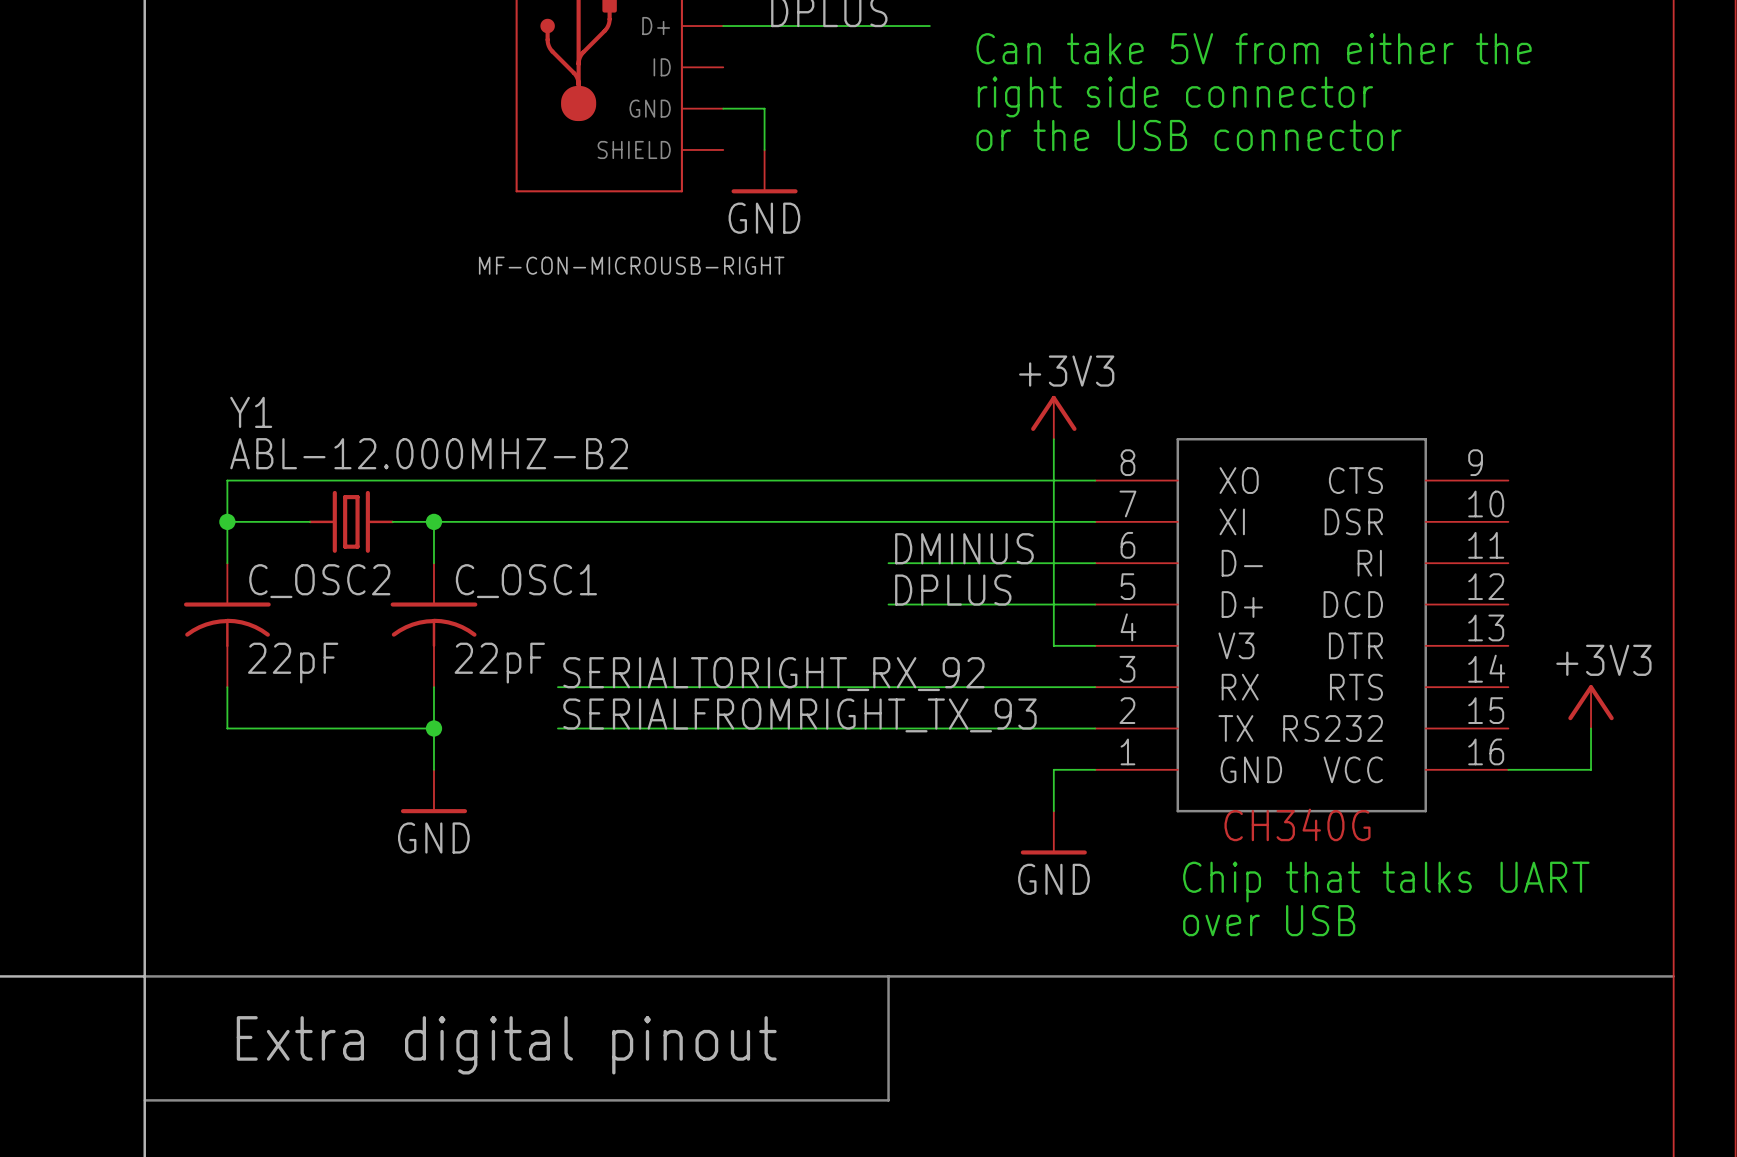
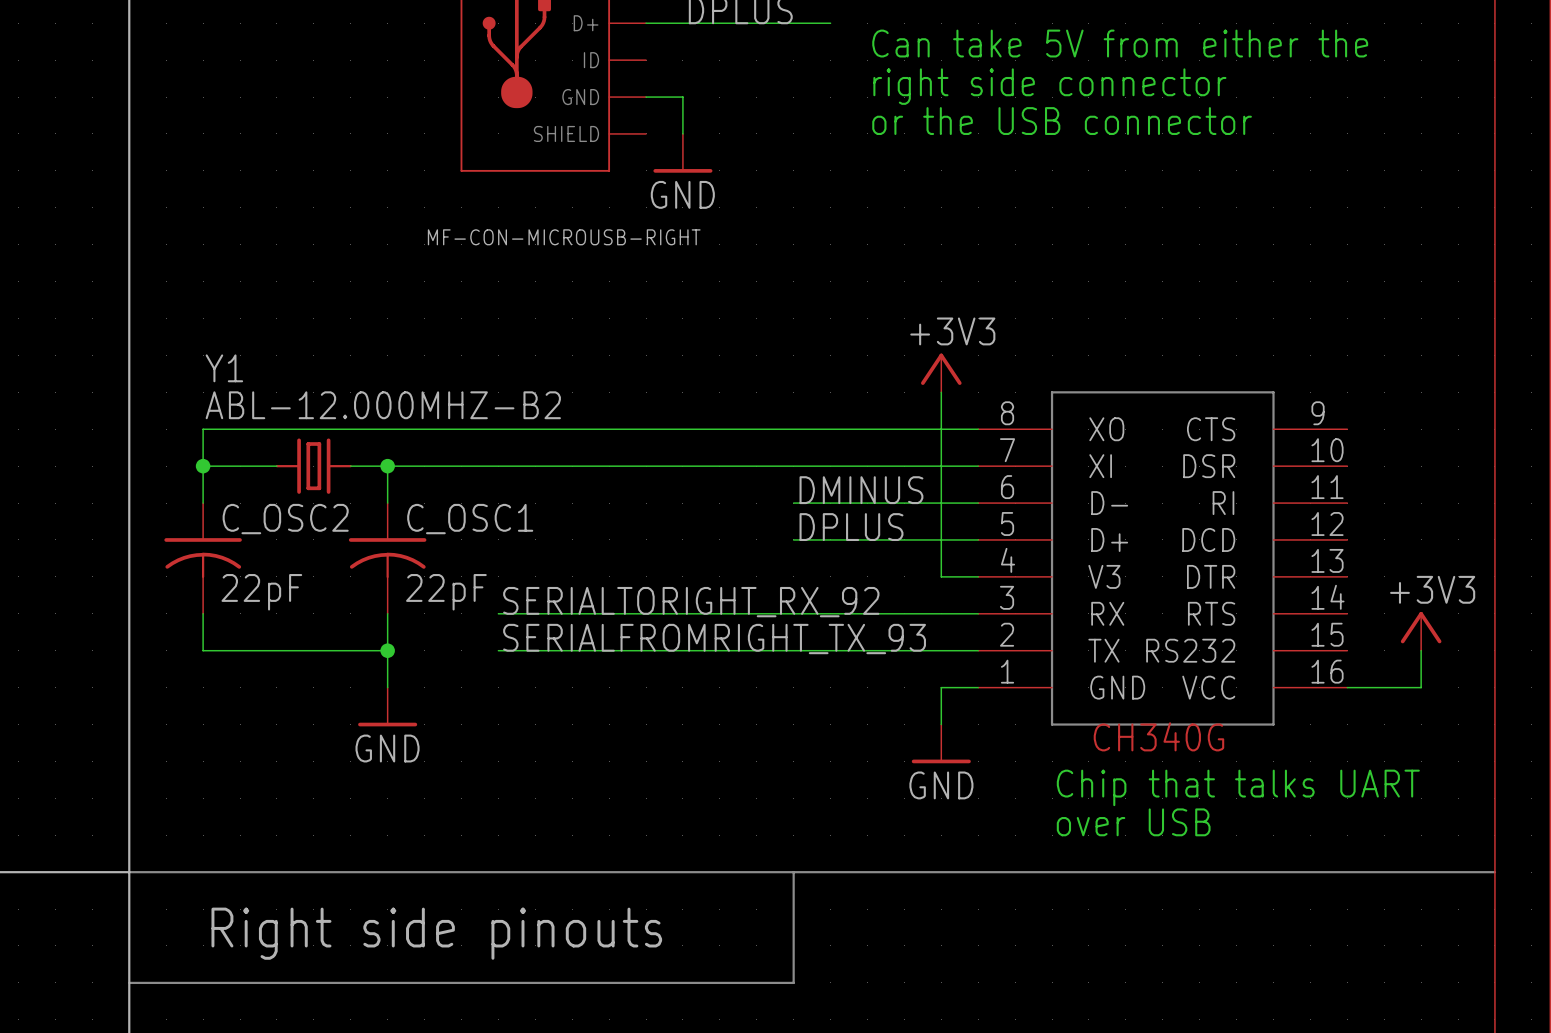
text: Extra digital pinout (506, 1045) -> Right side pinouts (436, 933)

